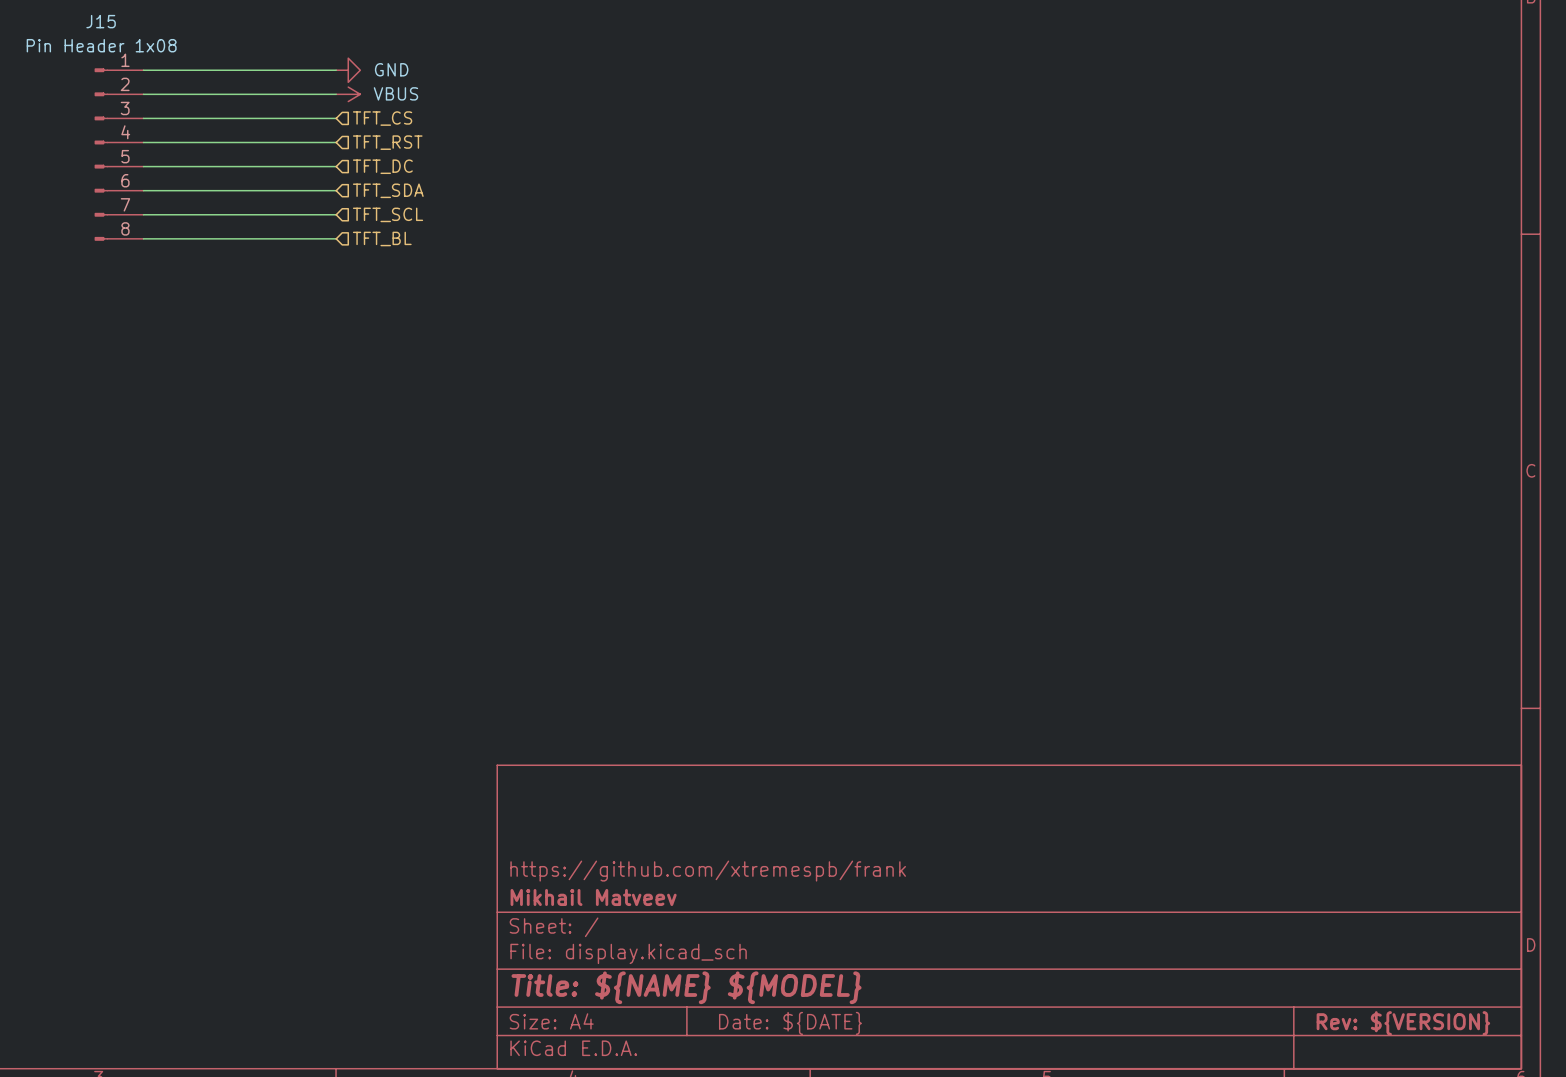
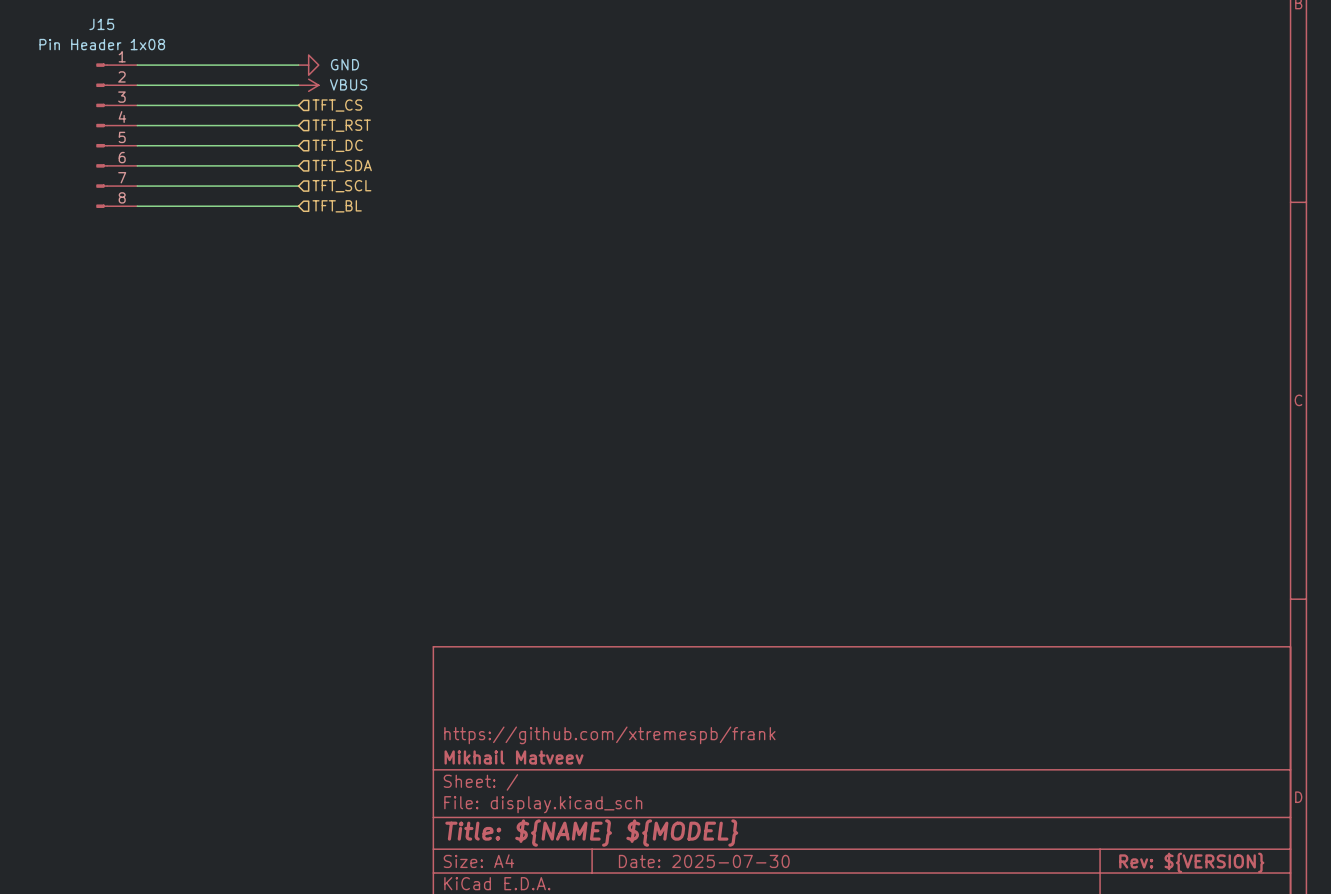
title block: Date: ${DATE} (790, 1023) -> Date: 2025-07-30 (704, 861)

